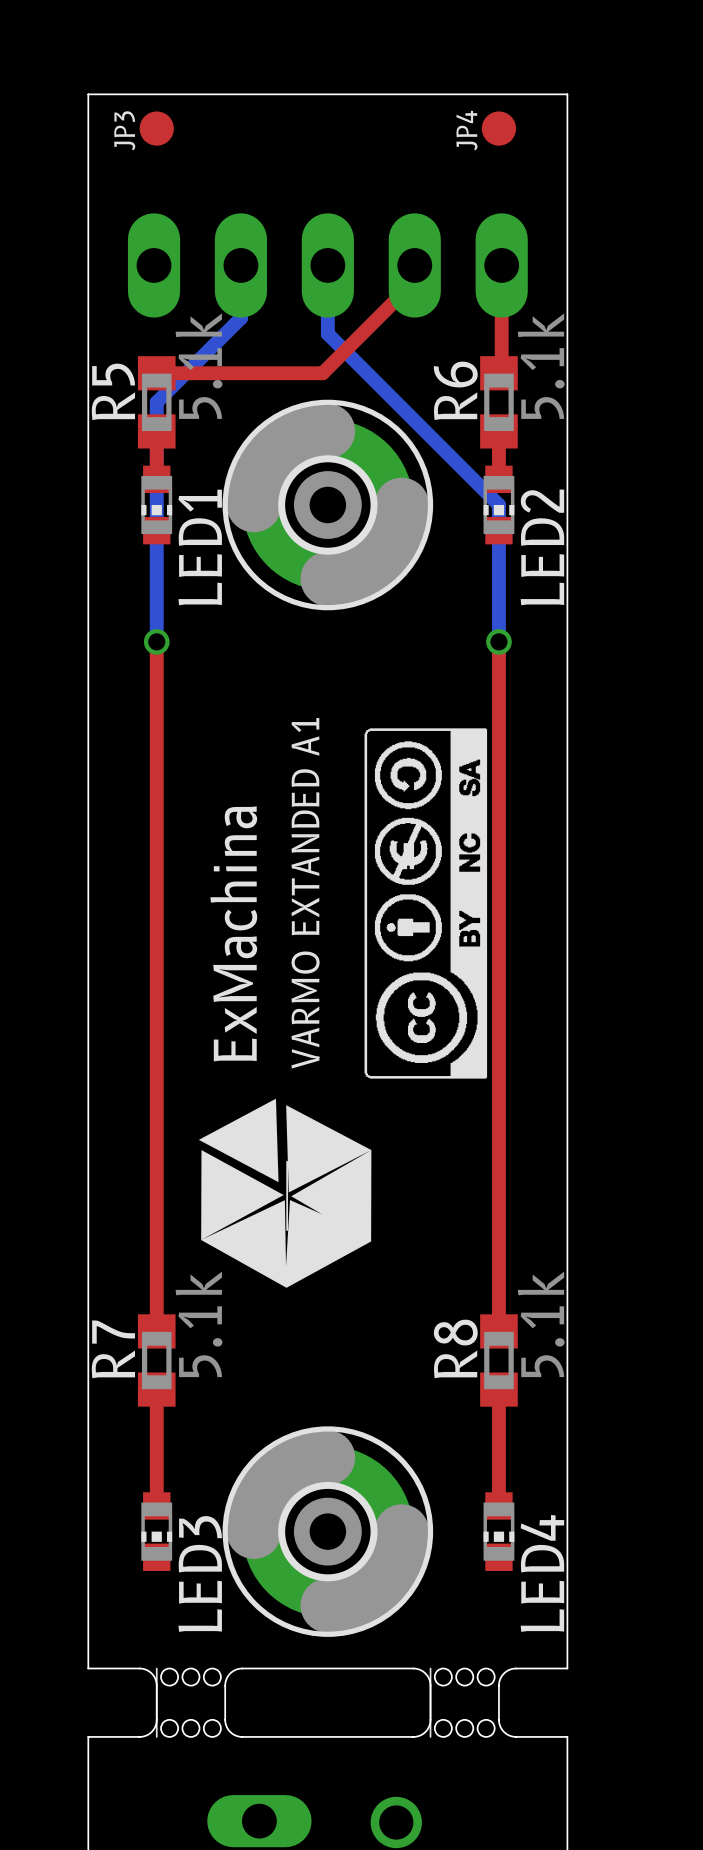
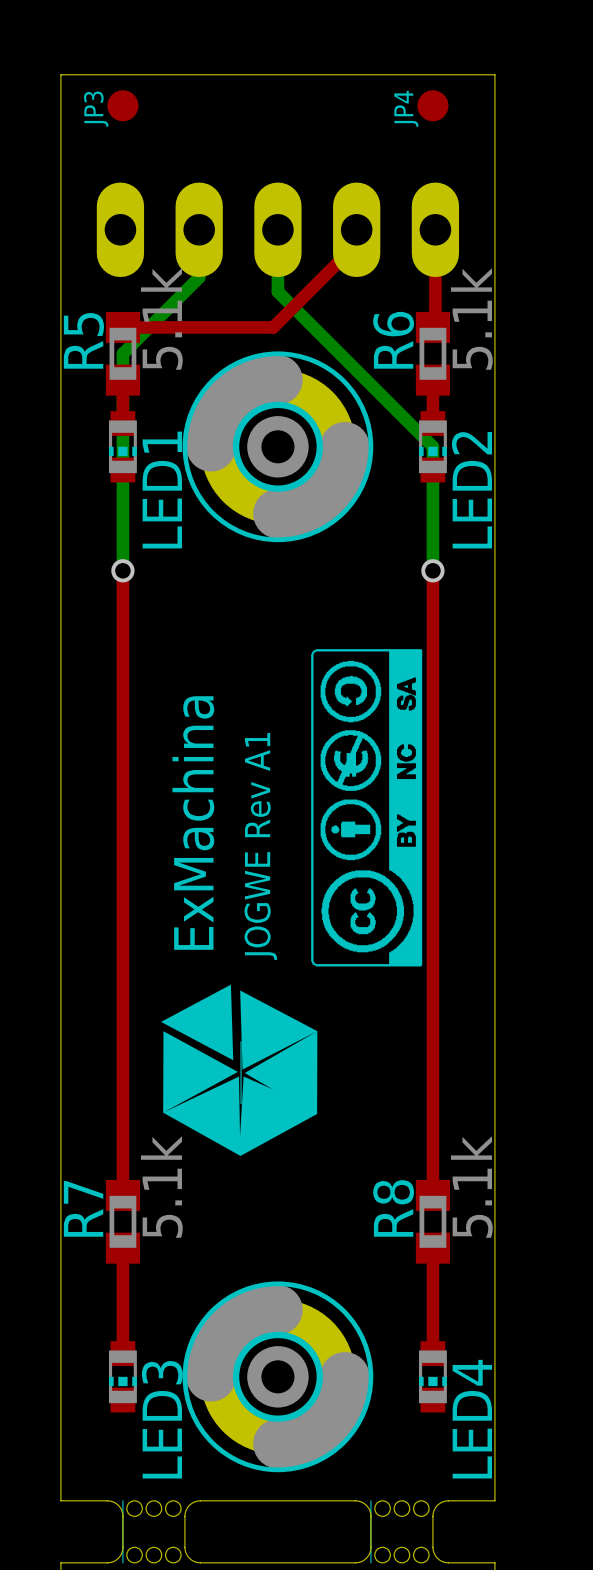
text: VARMO EXTANDED A1 (305, 893) -> JOGWE Rev A1 (260, 846)

